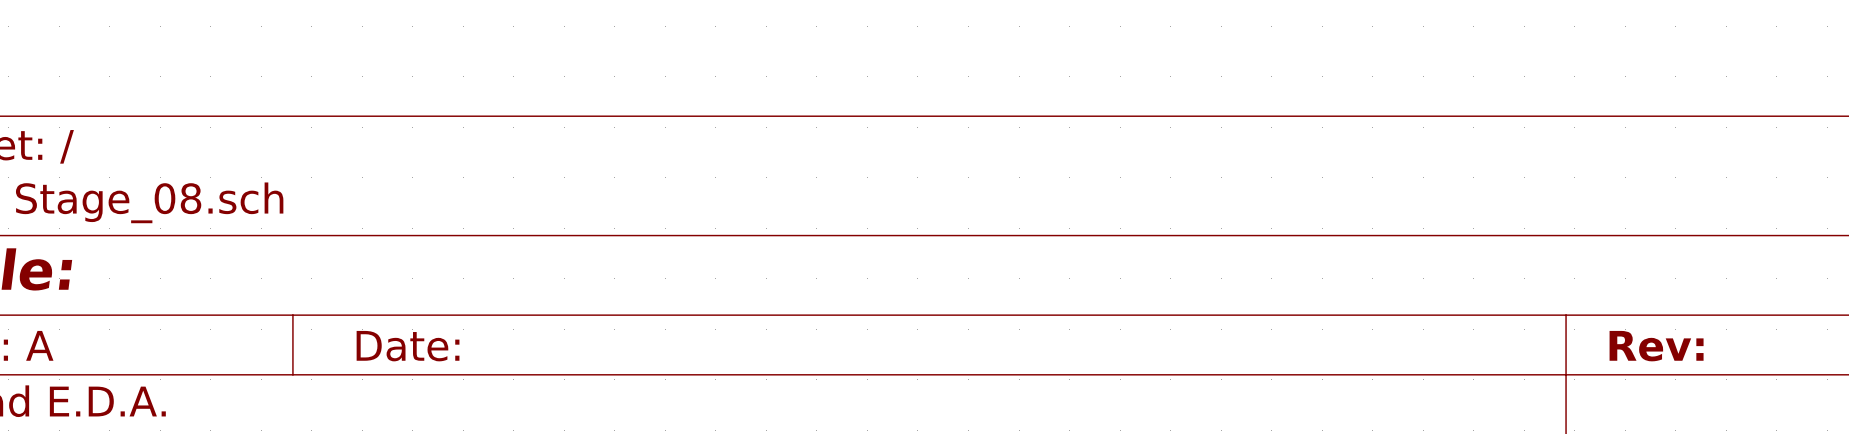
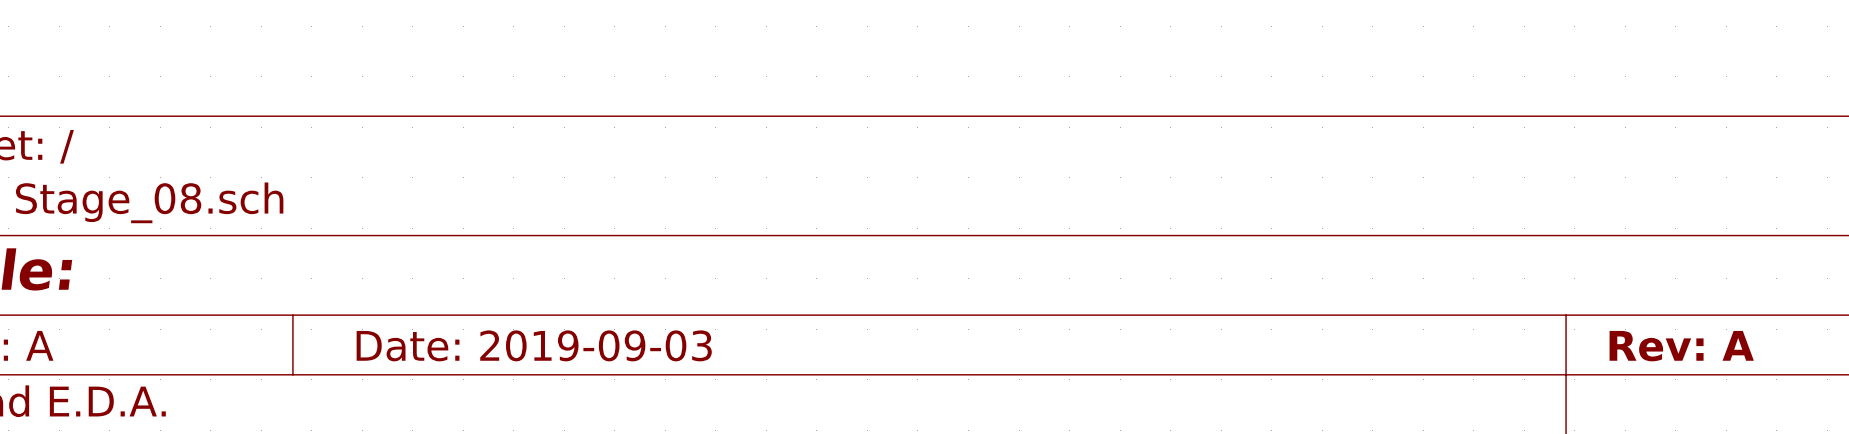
title block: Date: (408, 346) -> Date: 2019-09-03 (534, 345)
title block: Rev: (1656, 346) -> Rev: A (1681, 346)

